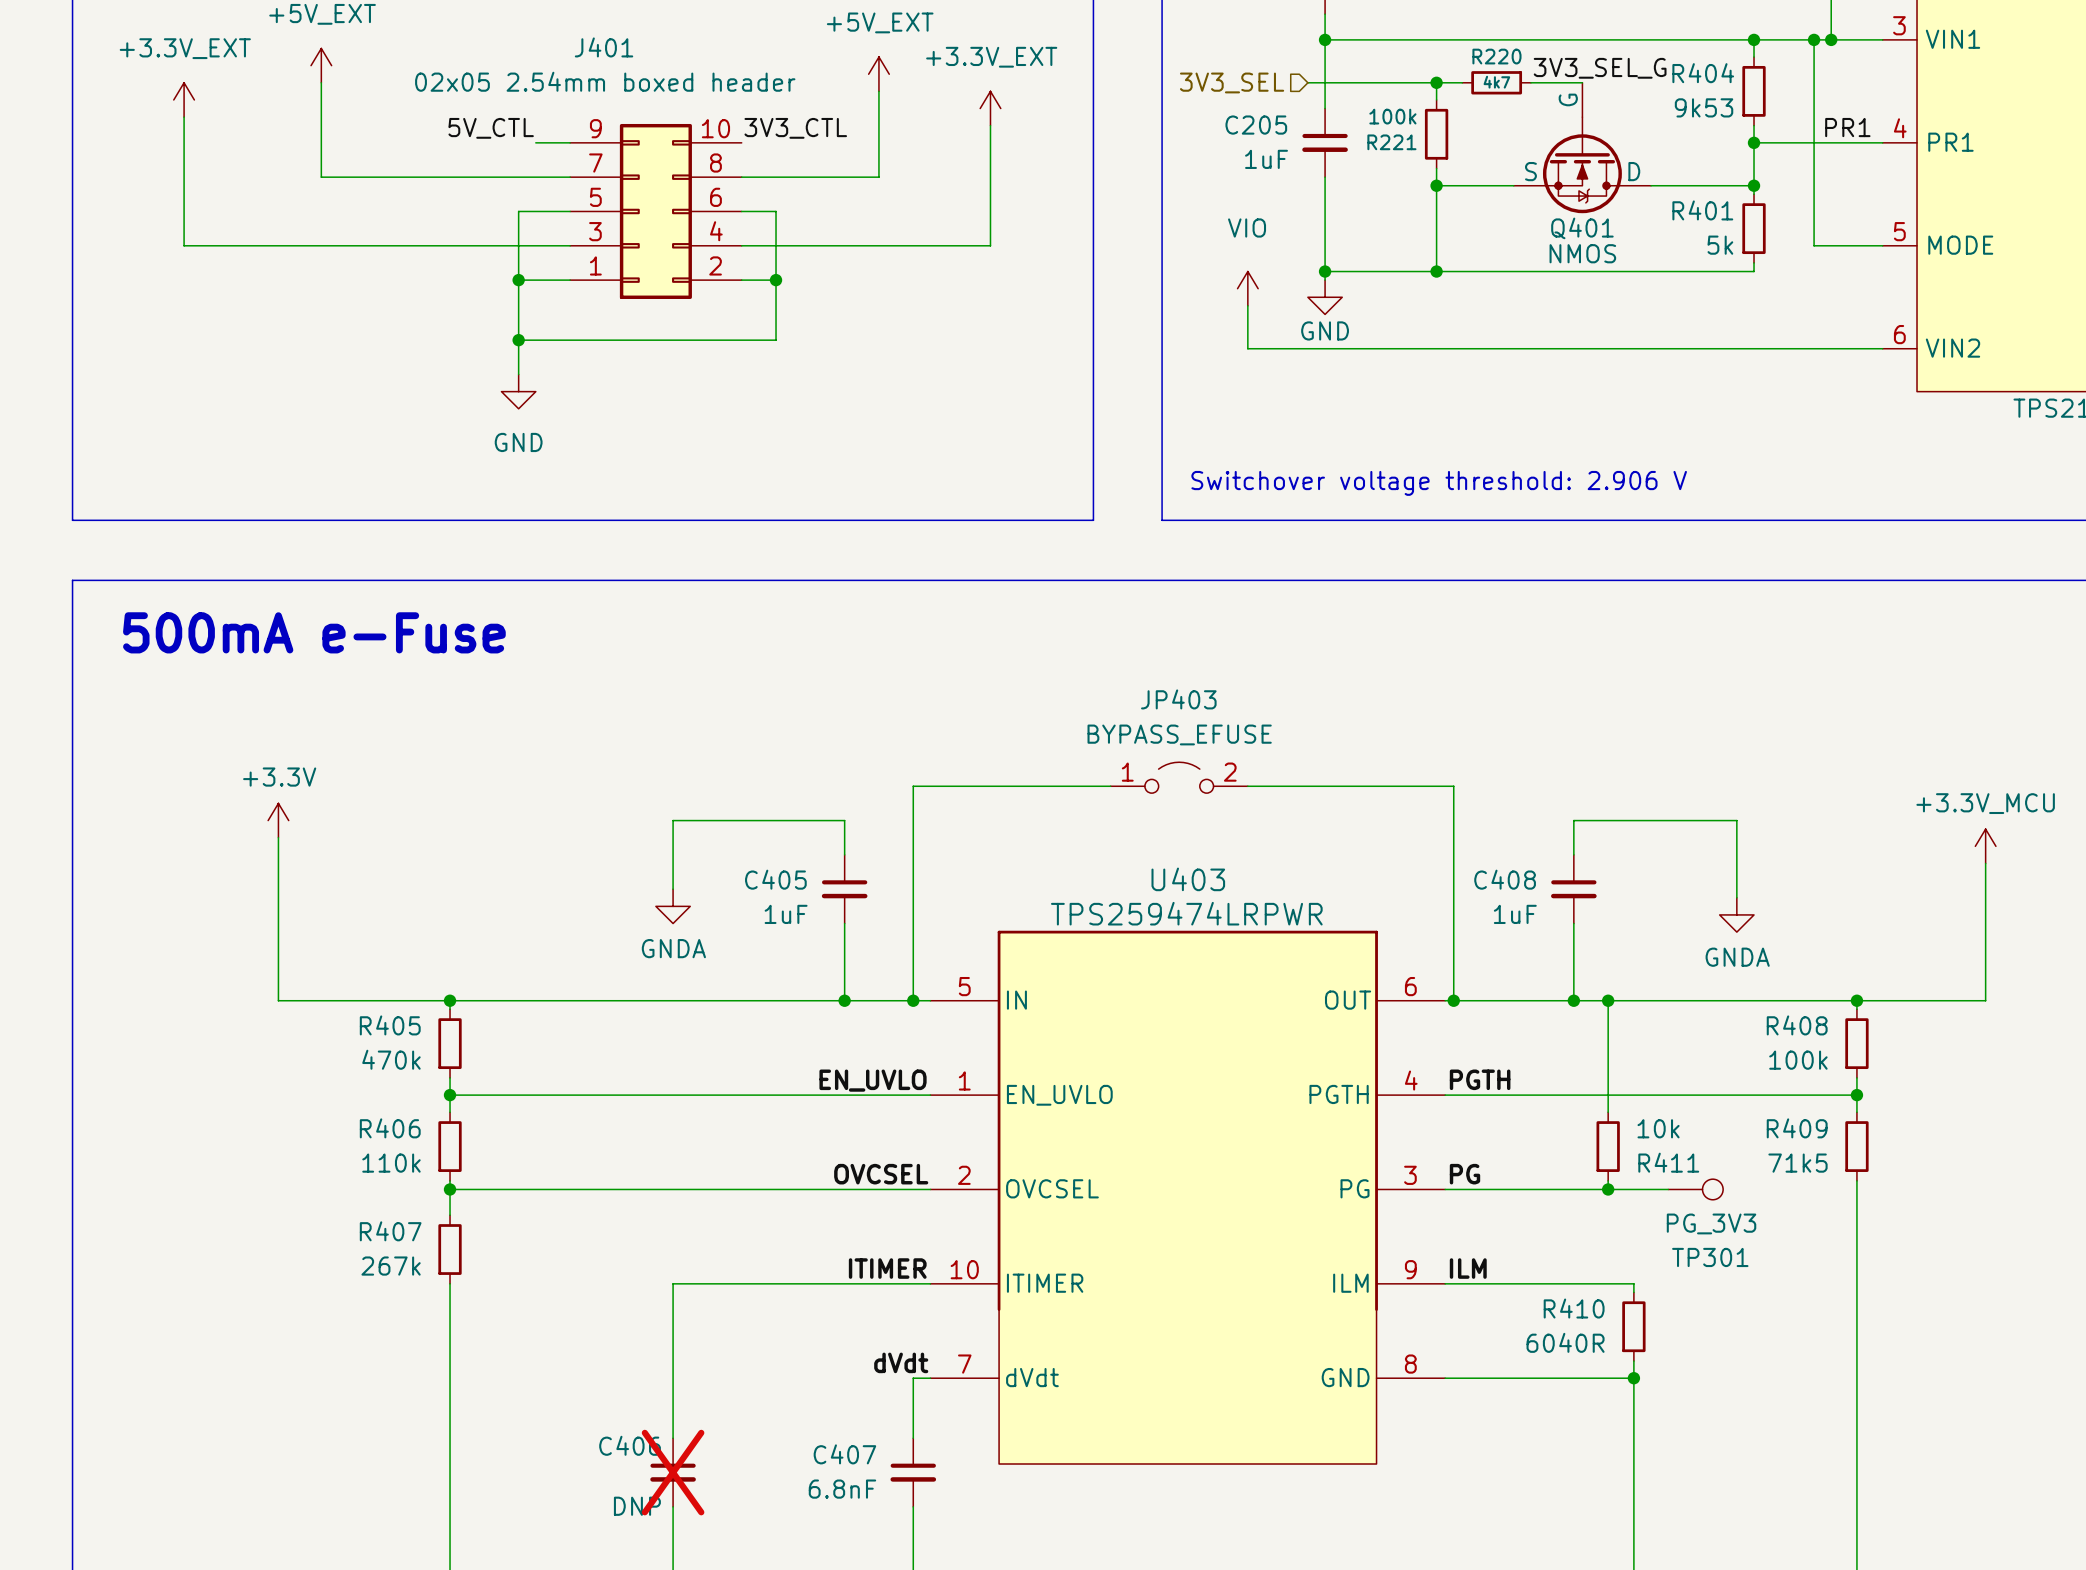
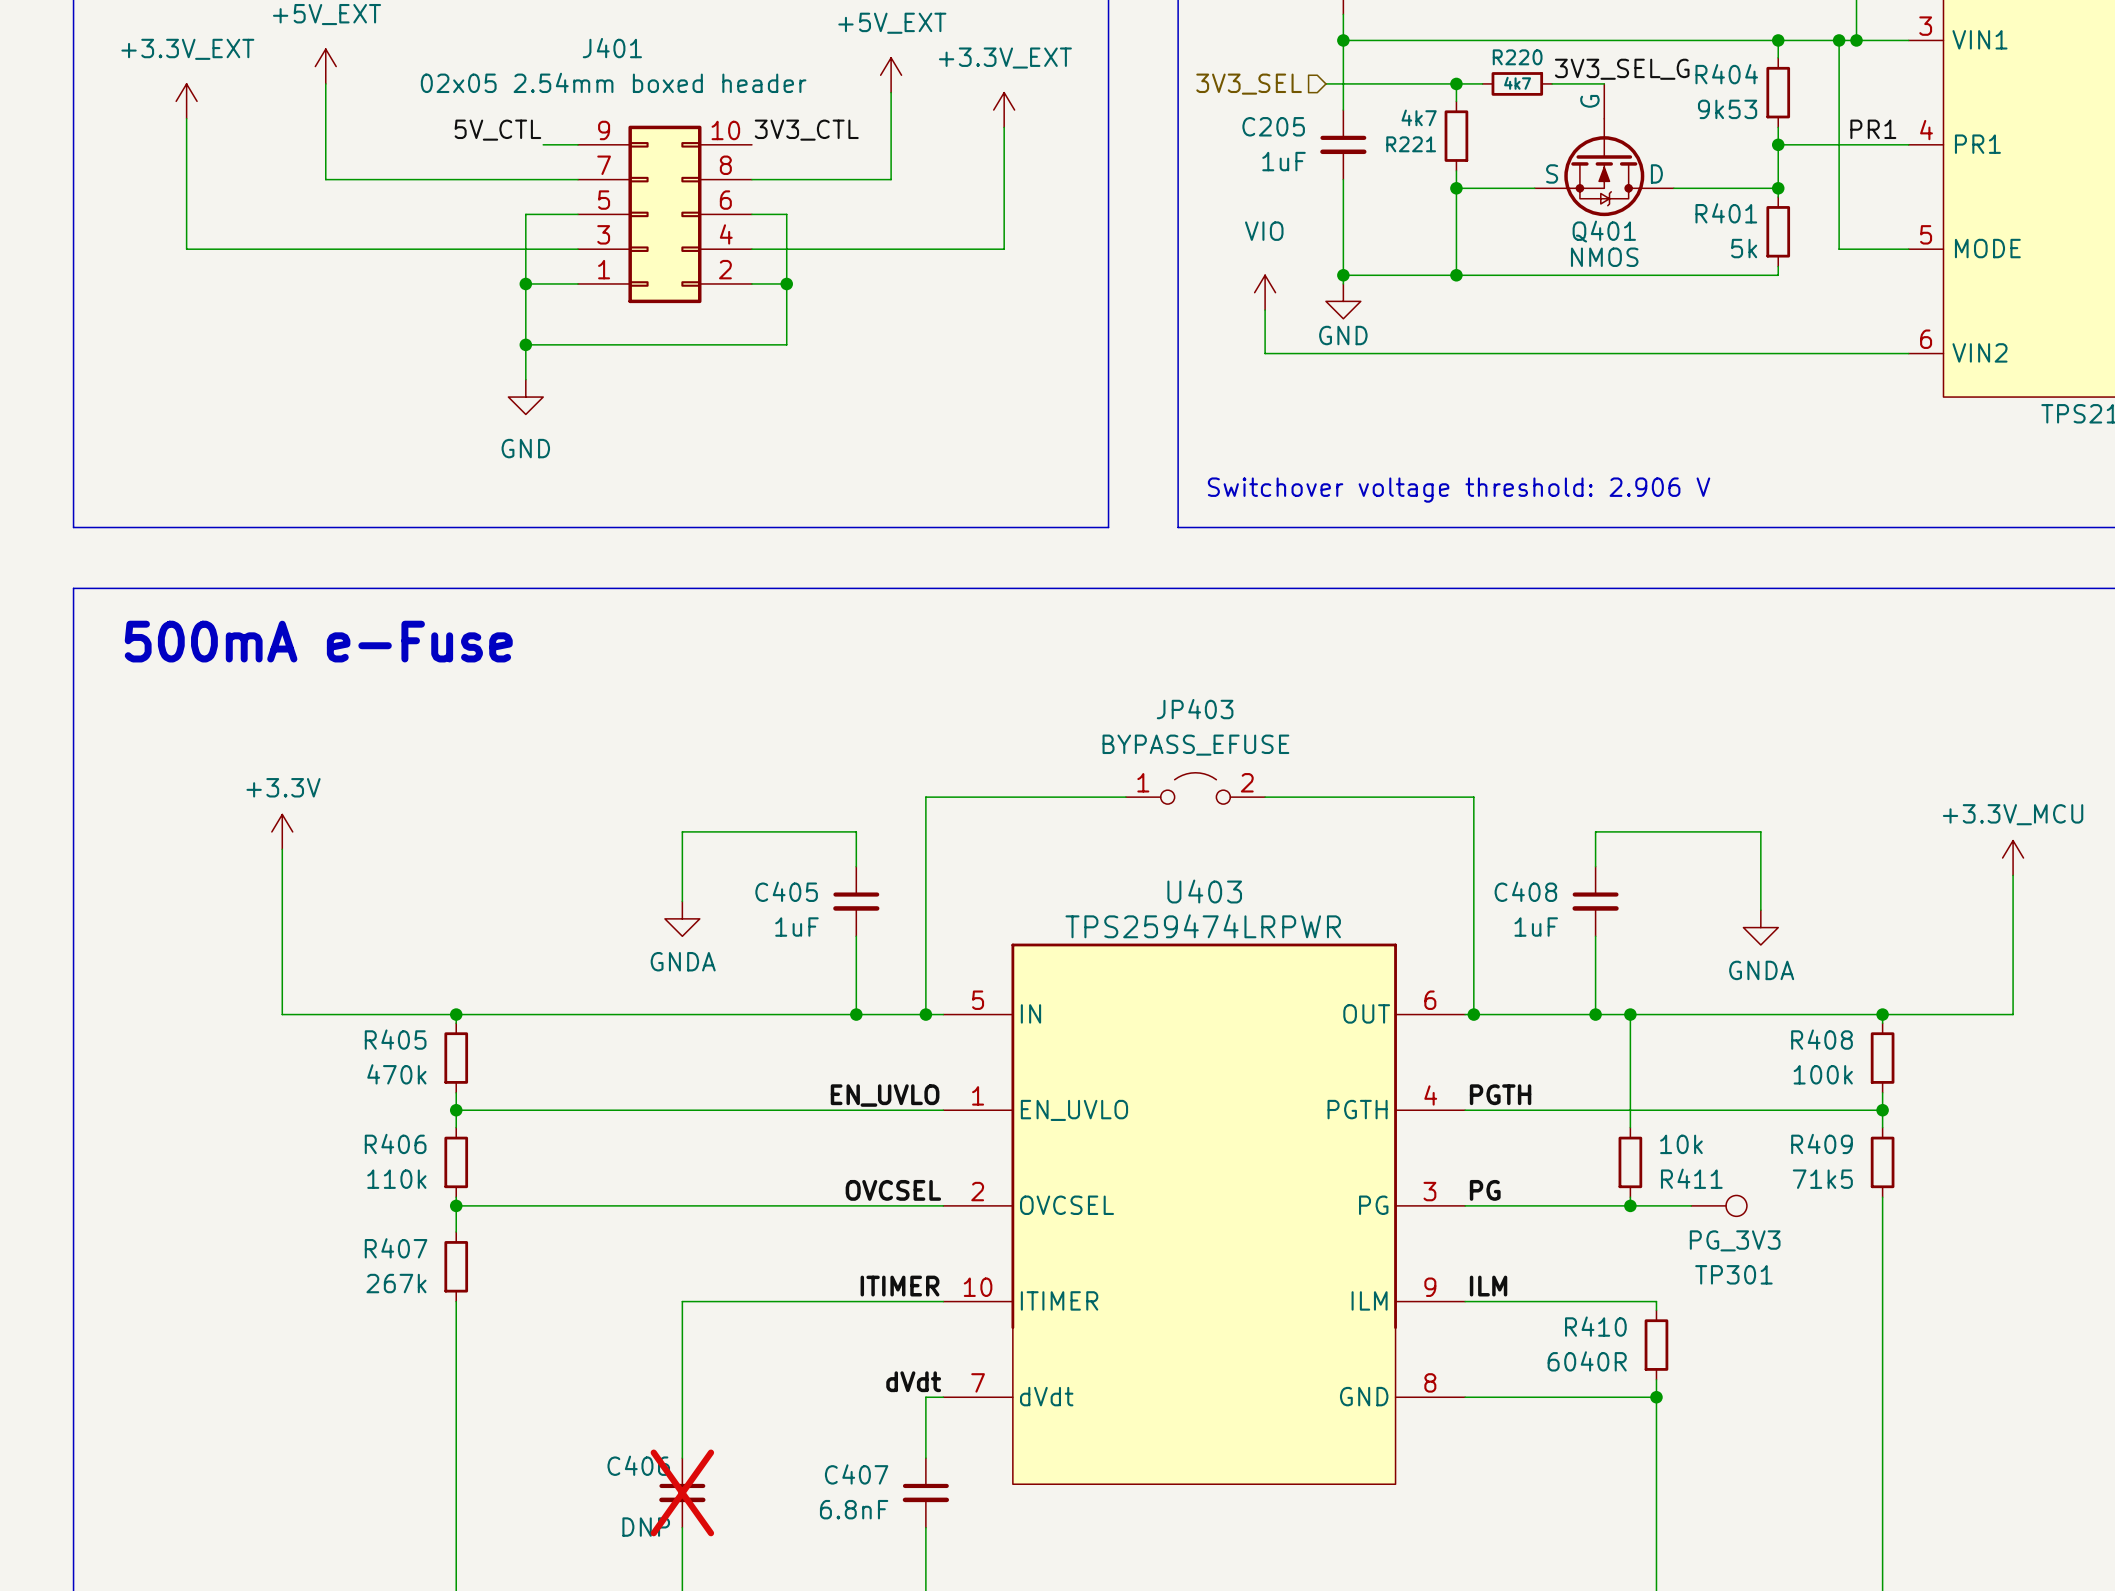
R221 value: 100k (1392, 116) -> 4k7 (1419, 117)

